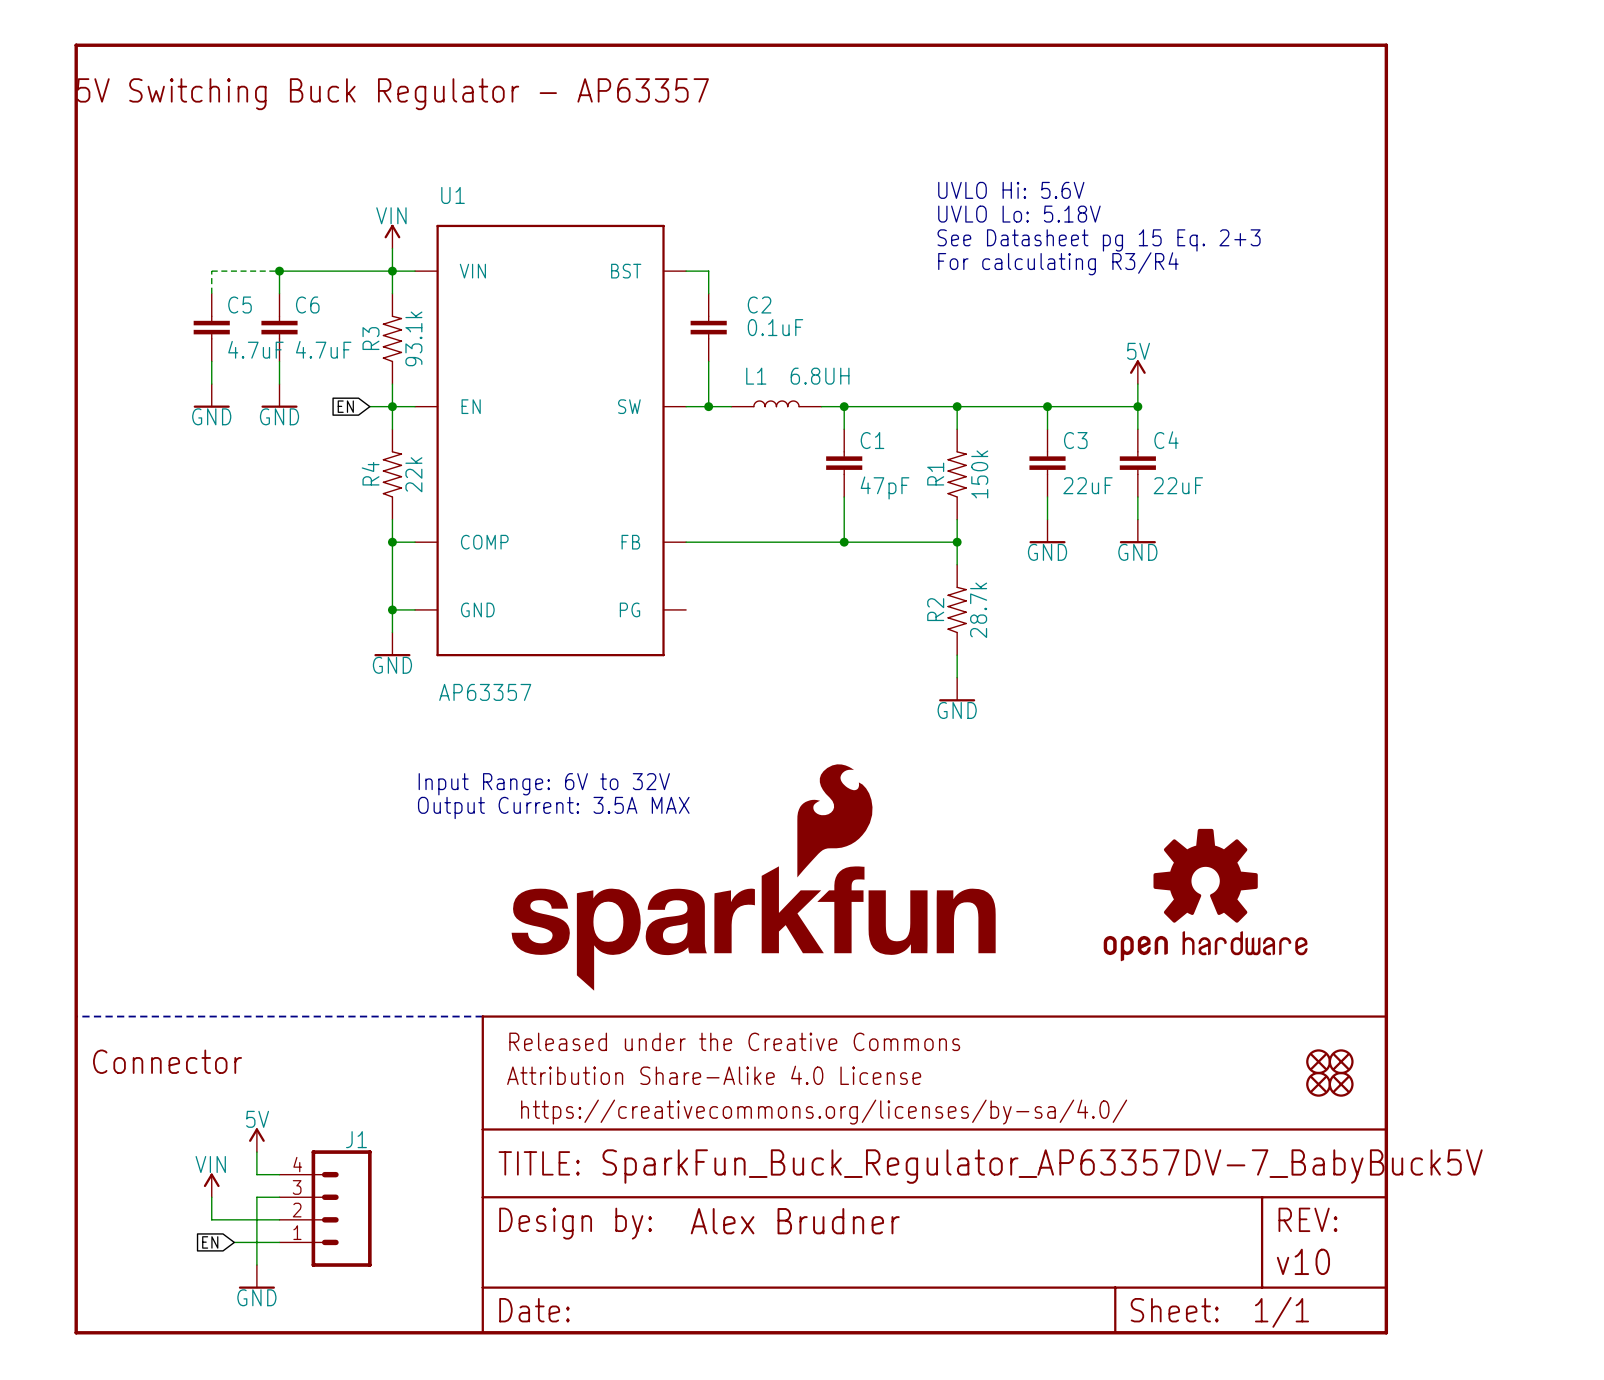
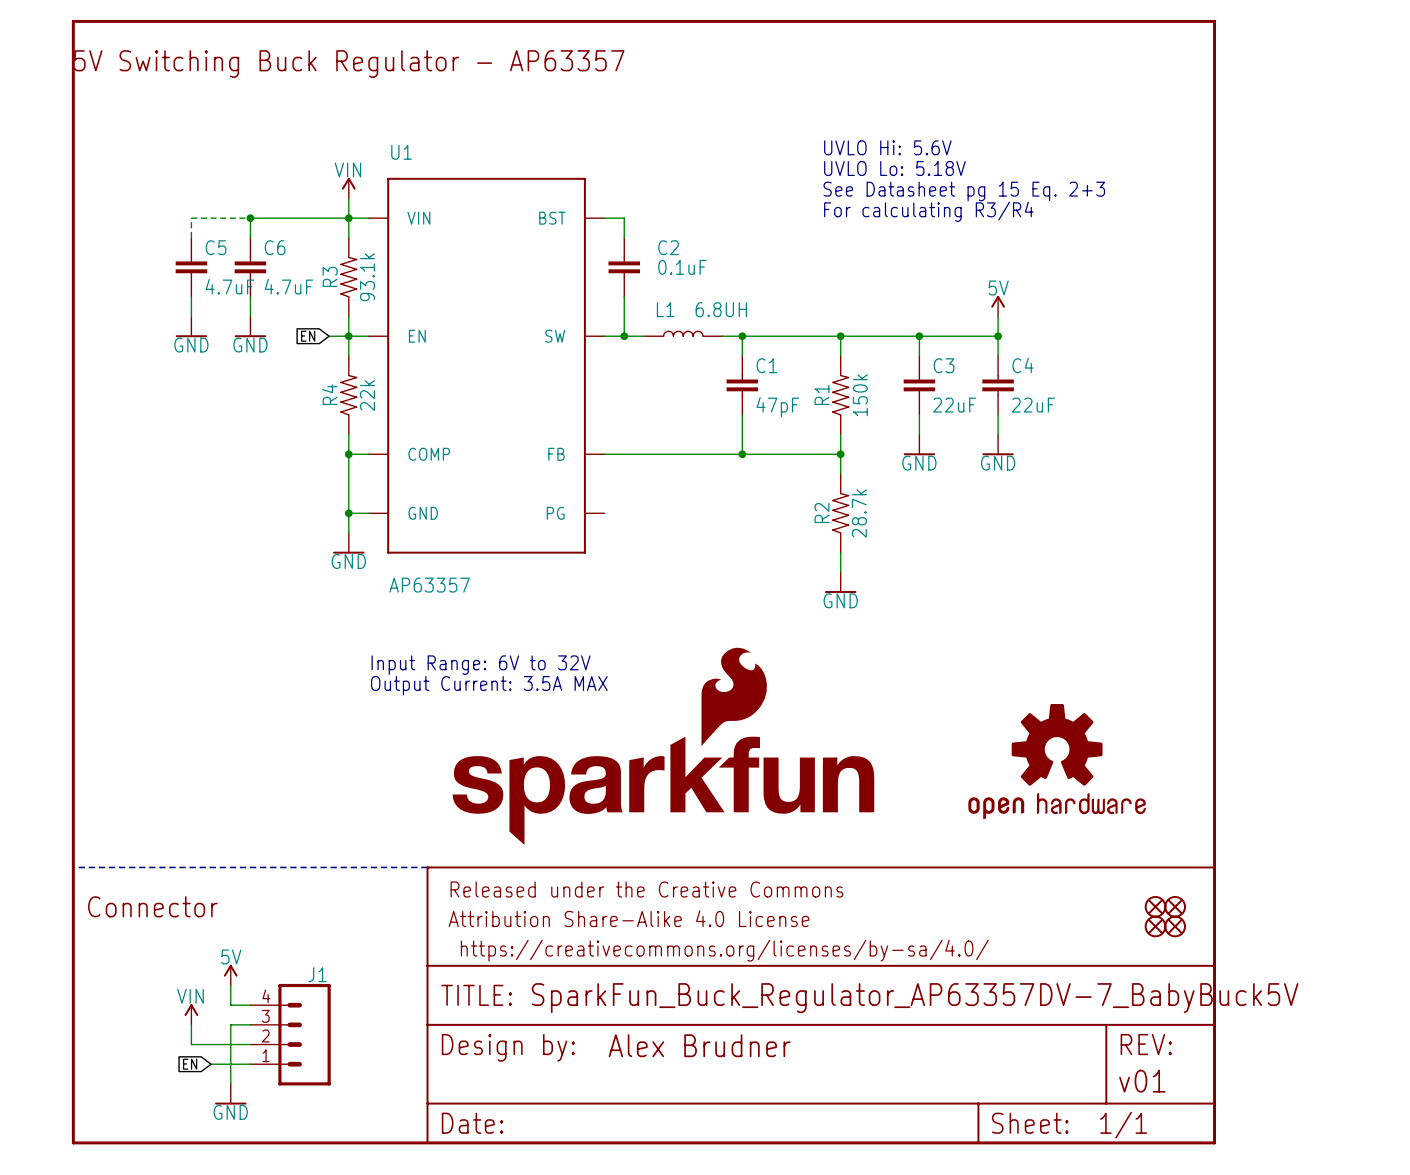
part text: v10 (1303, 1261) -> v01 (1142, 1081)

